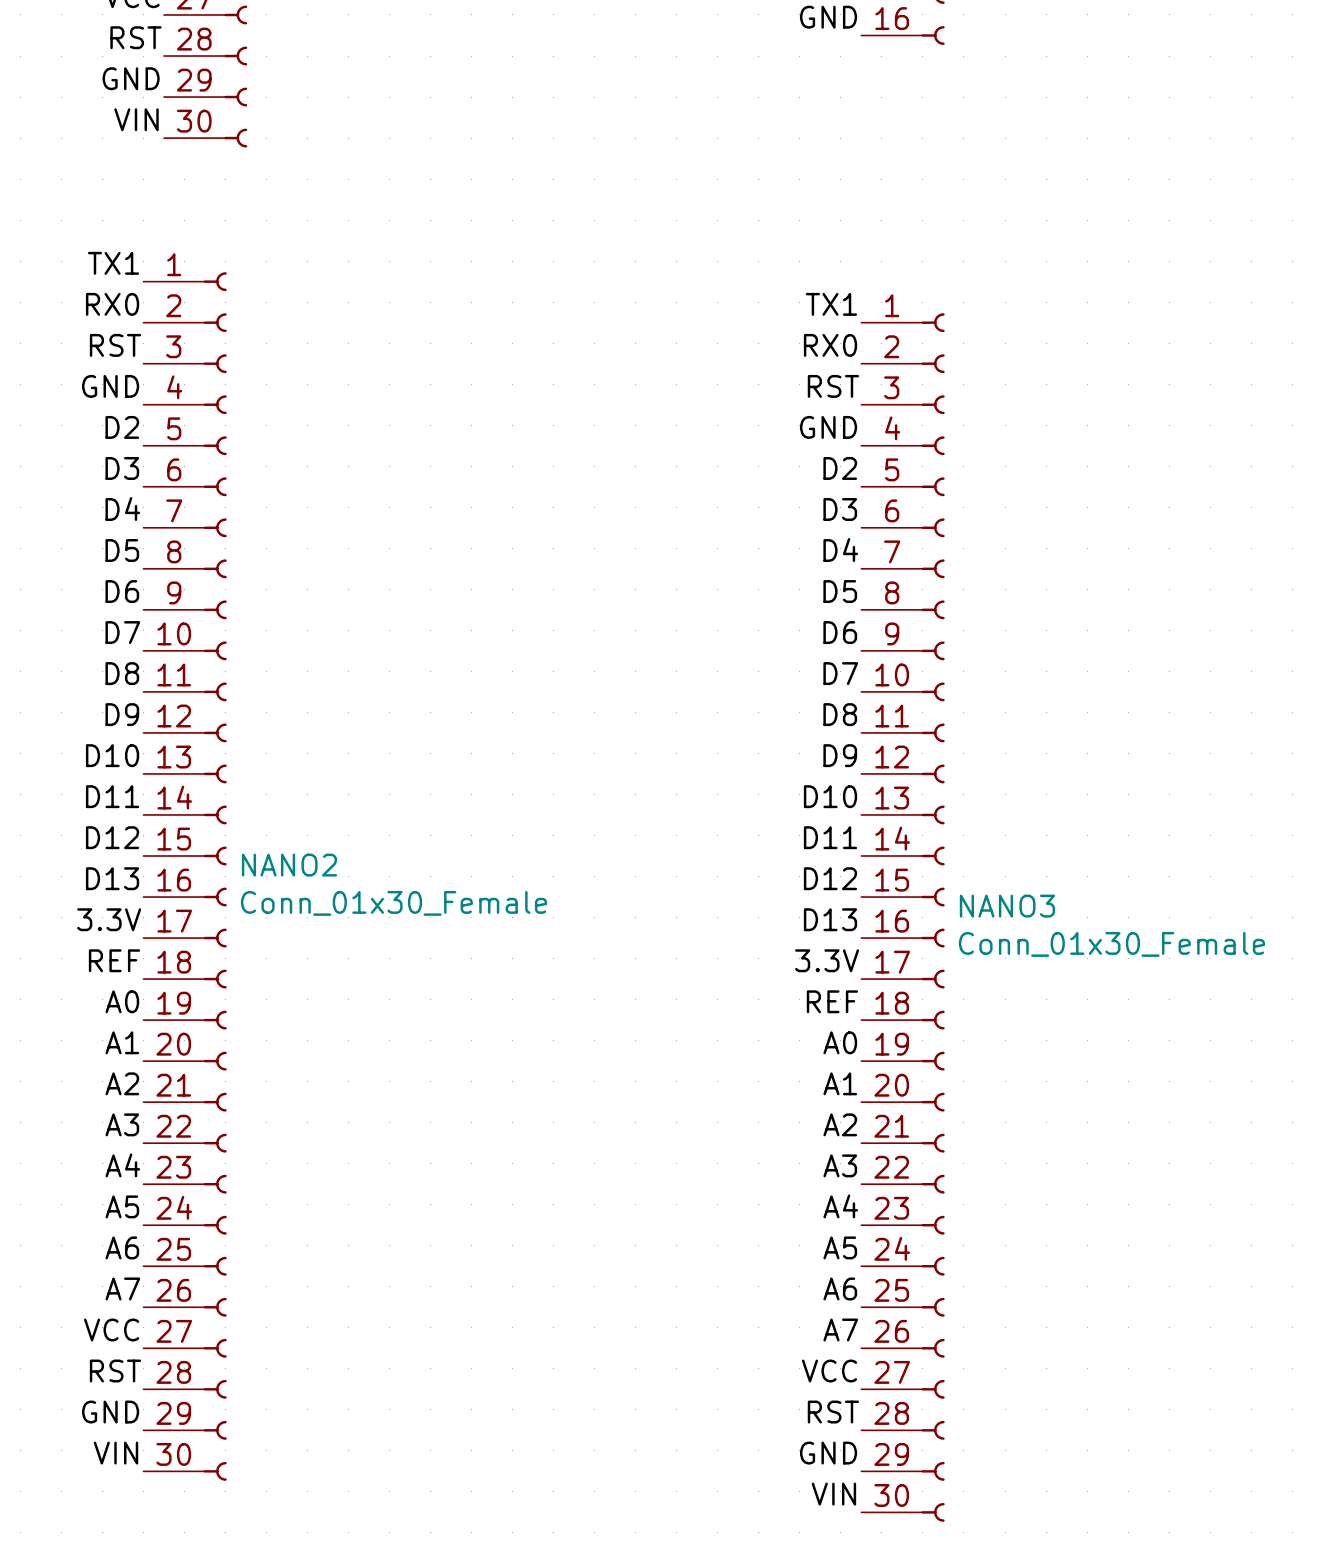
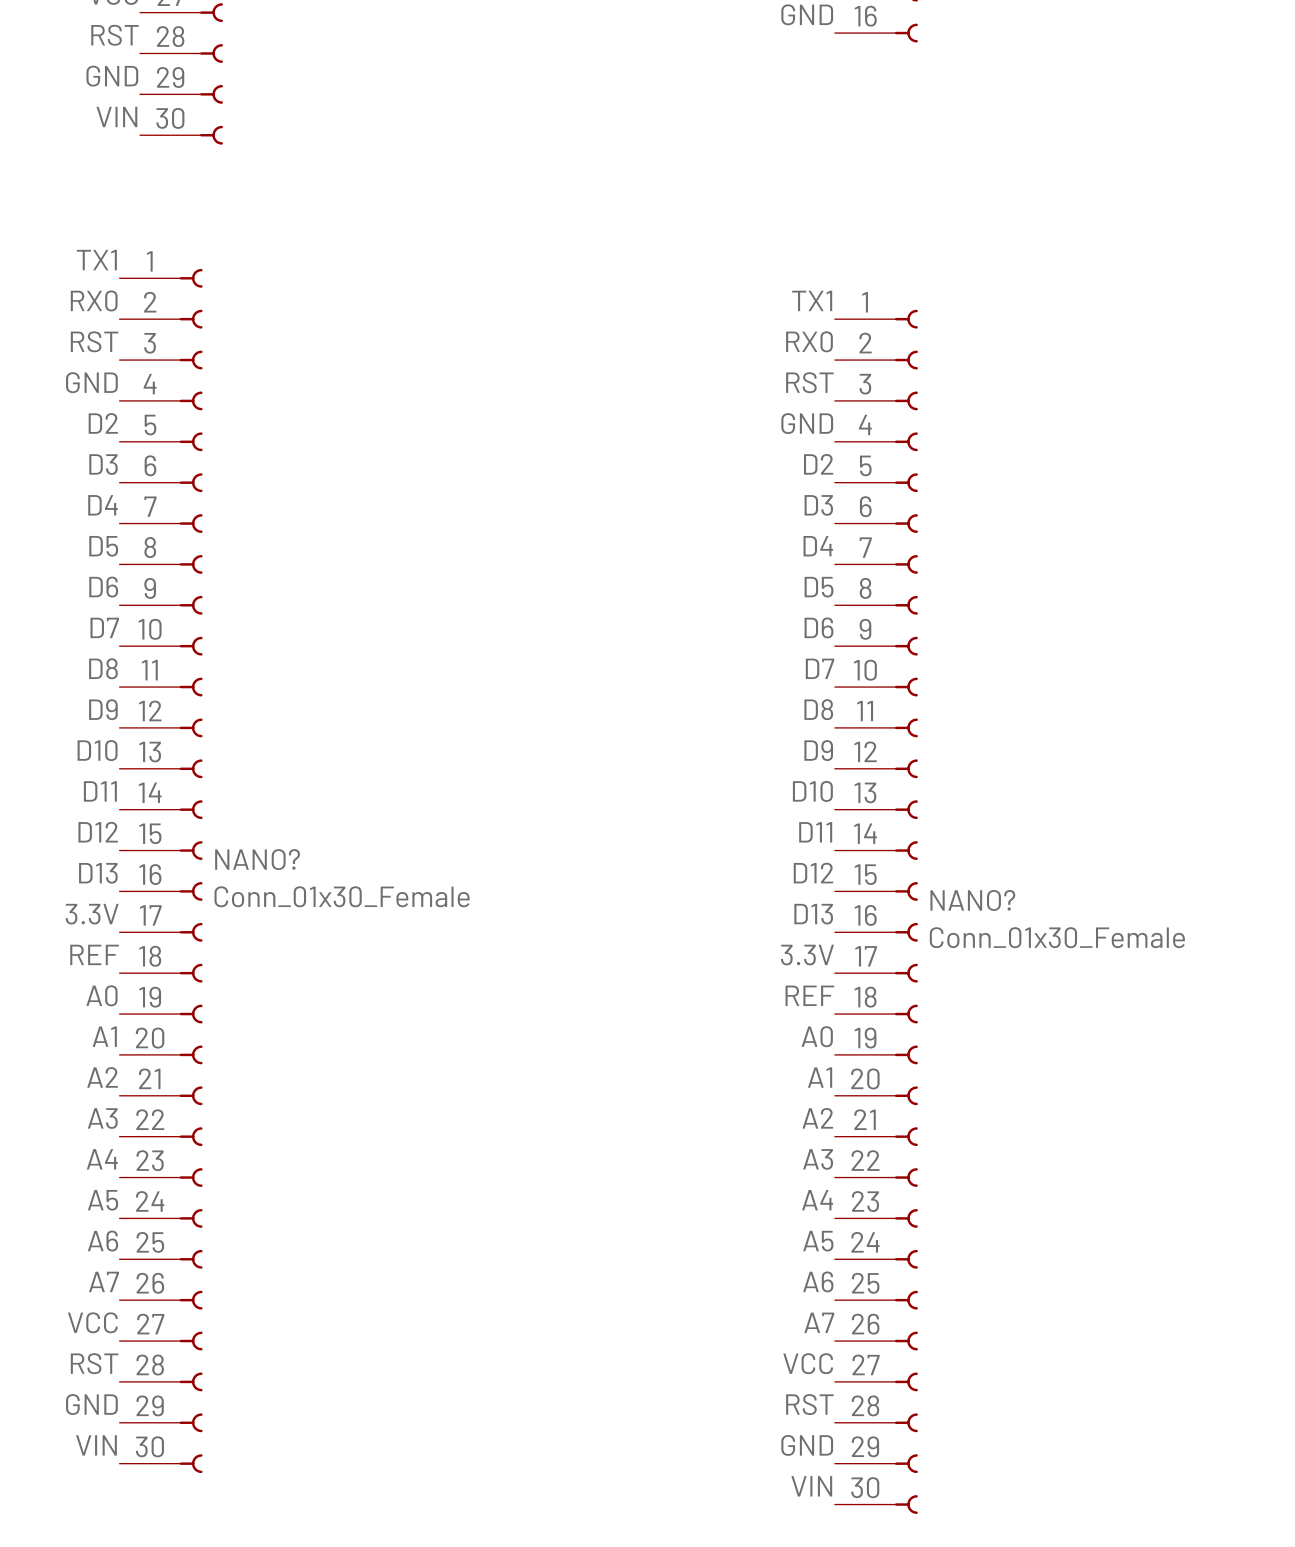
NANO2 name: NANO2 (289, 865) -> NANO? (257, 859)
NANO3 name: NANO3 (1007, 906) -> NANO? (972, 900)

